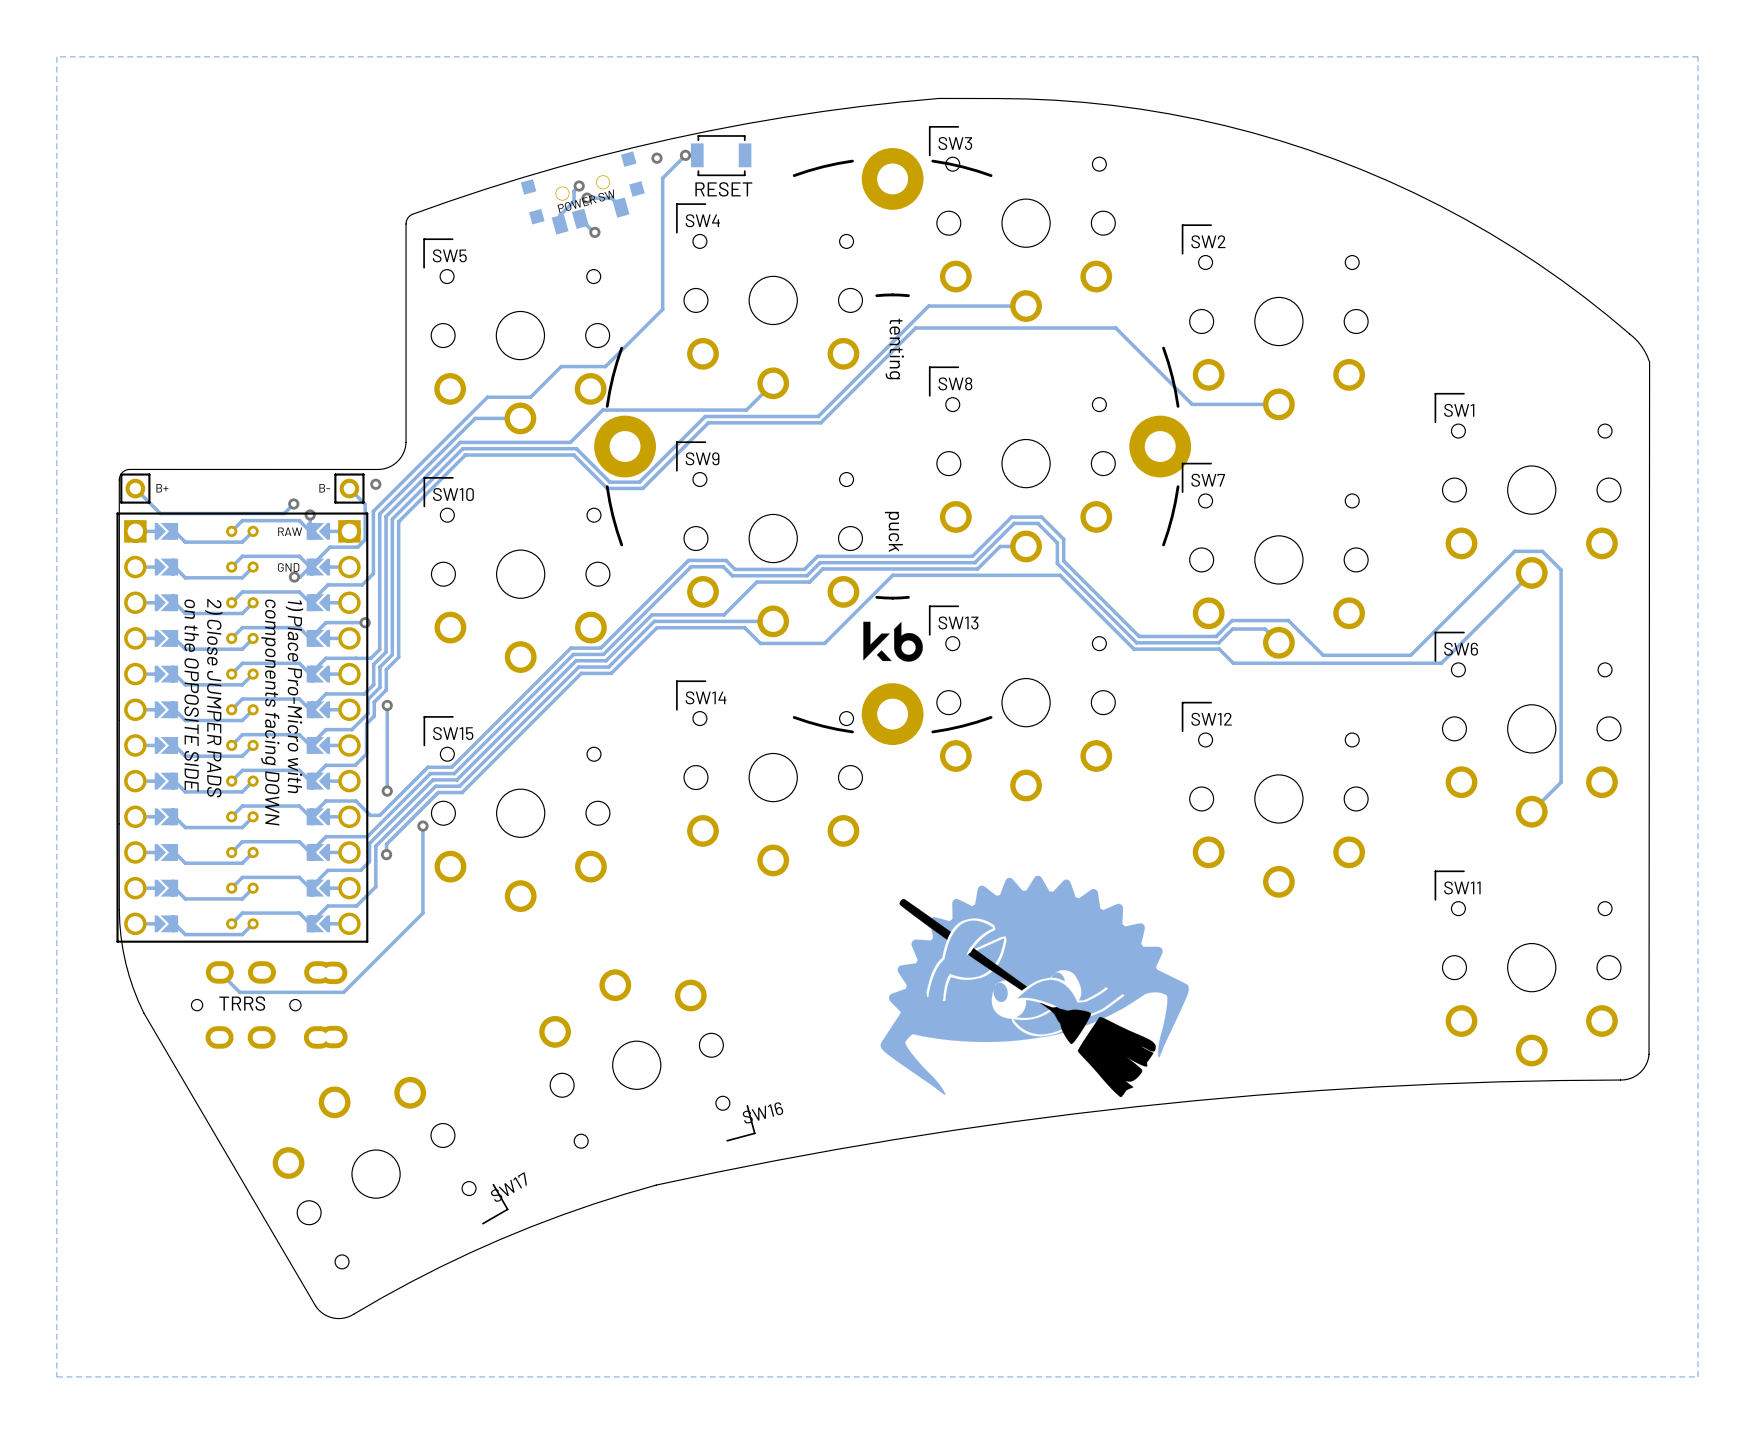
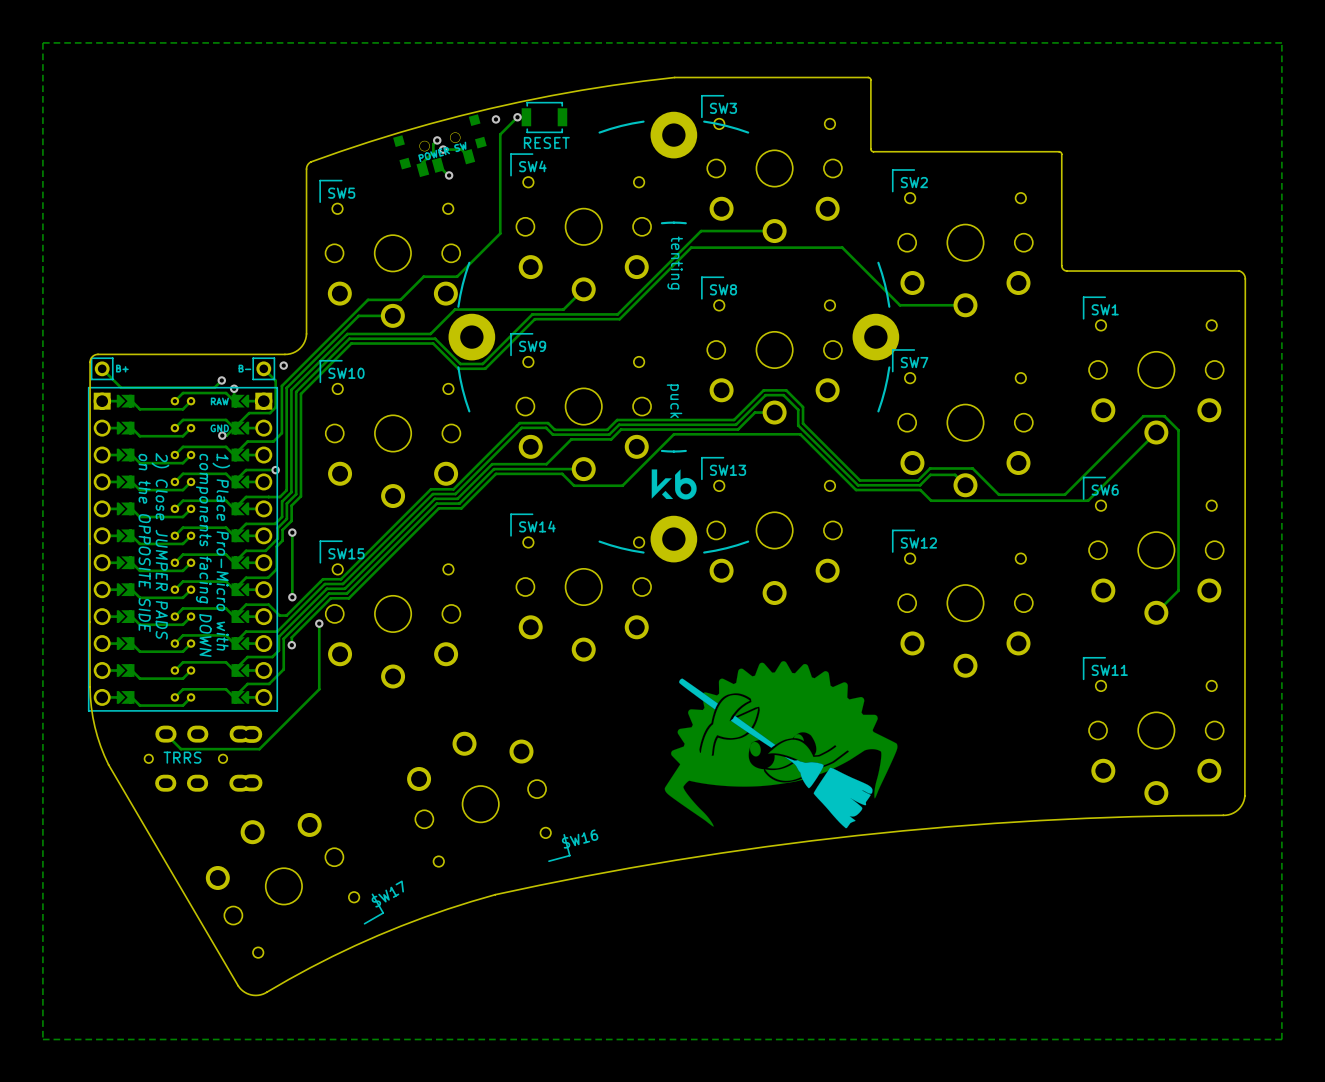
board edge: (412, 214) (485, 189) (596, 156) (671, 138) (785, 117) (938, 98) (1026, 98) (1112, 105) (1169, 113) (1253, 132) (1334, 159) (1414, 192) (1465, 219) (1514, 248) (1585, 297) (1638, 341) (1647, 356) (1649, 369) -> (311, 161) (370, 141) (460, 115) (551, 95) (612, 85) (674, 77) (868, 77) (870, 80) (870, 149) (872, 151) (1060, 152) (1061, 265) (1064, 270) (1239, 271) (1243, 274) (1245, 278)

